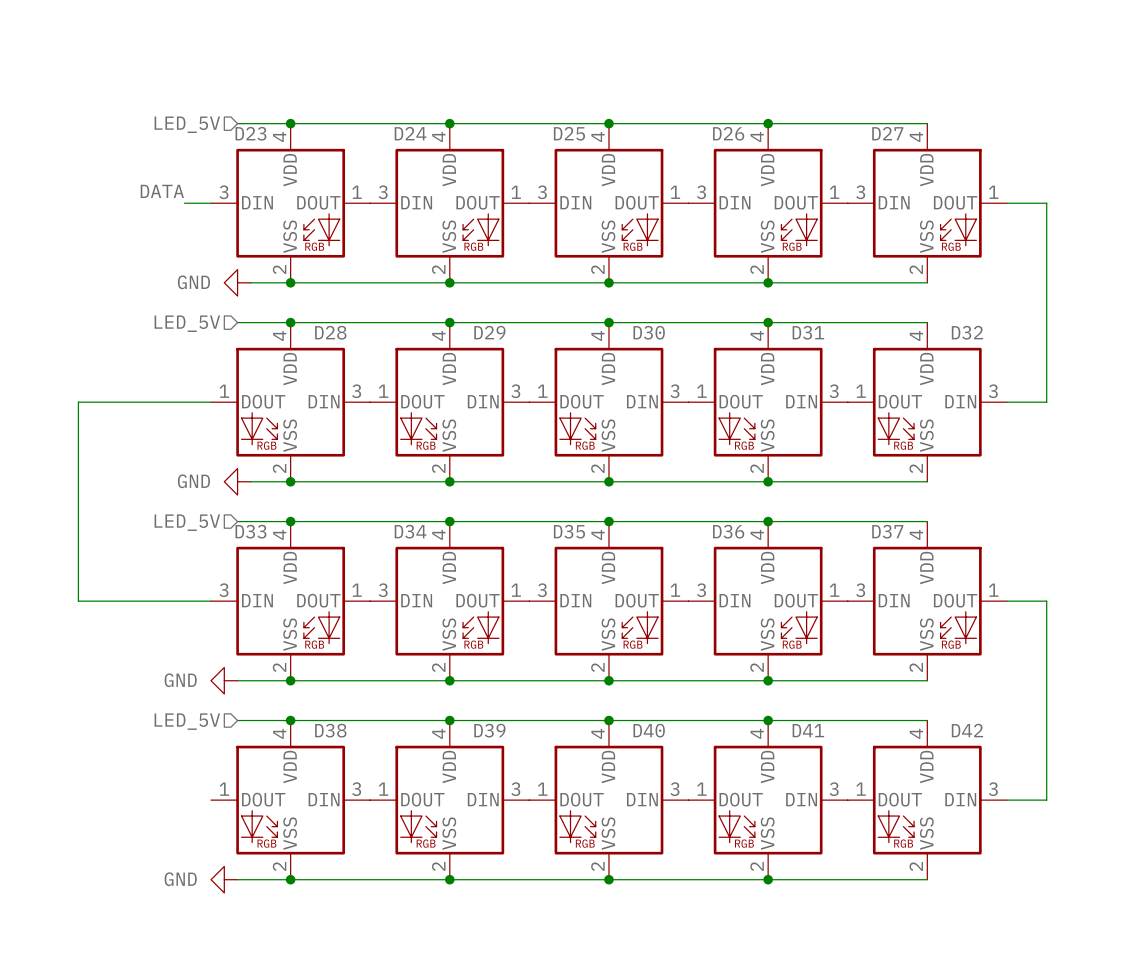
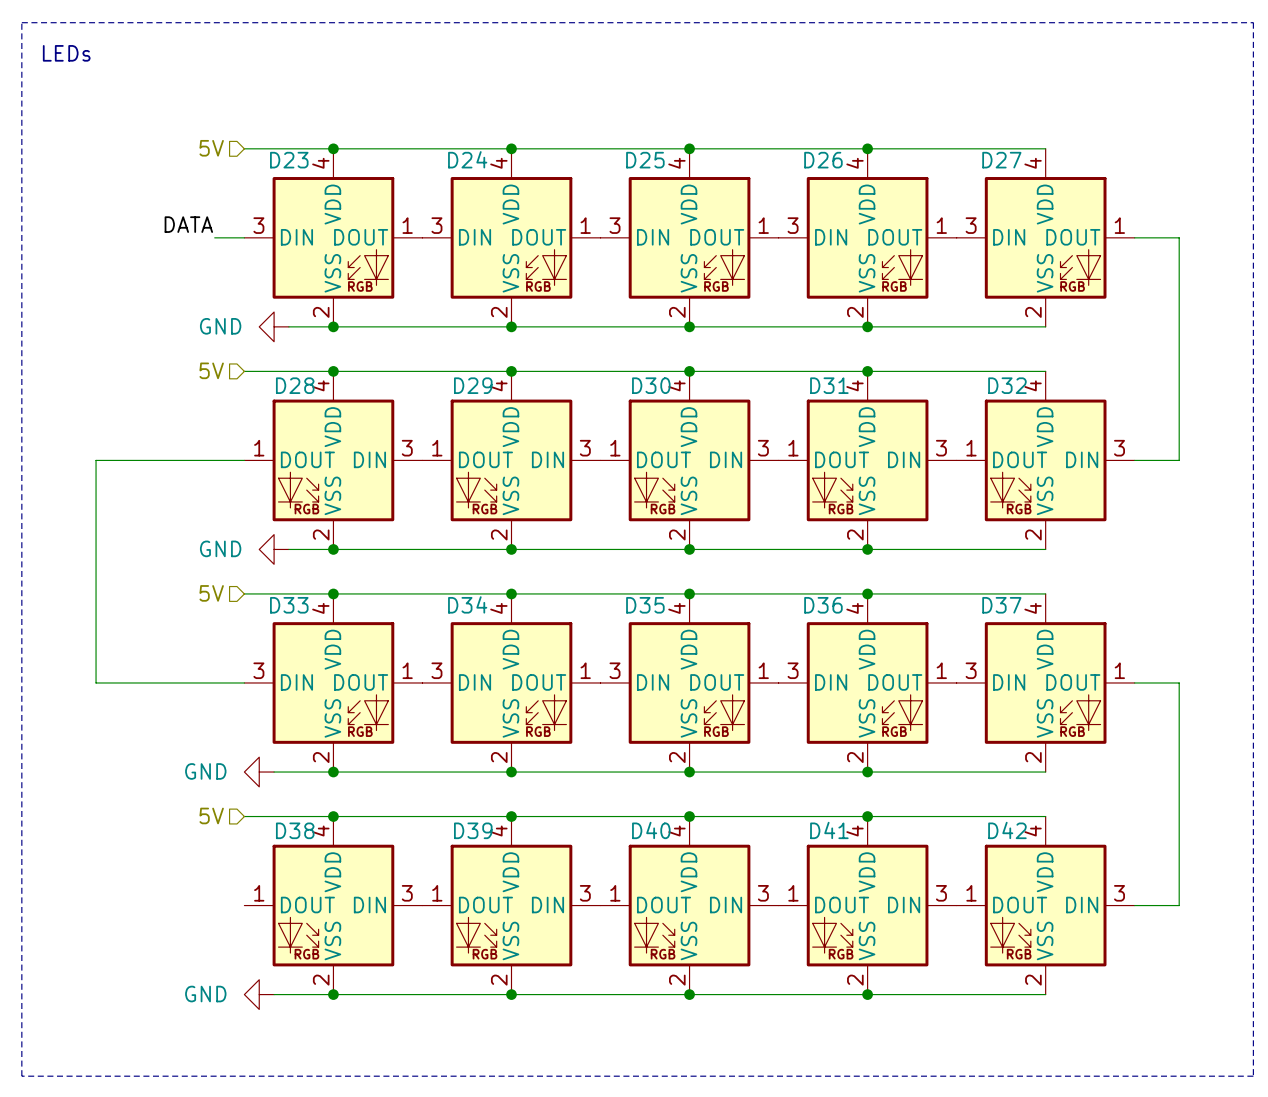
line: none -> (21, 22) (1253, 22) (1253, 1076) (21, 1076) (21, 22)
text: none -> LEDs (66, 53)
hierarchical label: none -> 5V (211, 148)
wire: none -> (244, 148) (274, 148)
hierarchical label: LED_5V (187, 124) -> none
hierarchical label: none -> 5V (211, 370)
wire: none -> (244, 371) (274, 371)
hierarchical label: LED_5V (187, 323) -> none
D28 name position: D28 (330, 332) -> D28 (295, 385)
D29 name position: D29 (489, 332) -> D29 (473, 385)
D30 name position: D30 (649, 332) -> D30 (651, 385)
D31 name position: D31 (808, 332) -> D31 (829, 385)
D32 name position: D32 (967, 332) -> D32 (1007, 385)
hierarchical label: none -> 5V (211, 593)
wire: none -> (244, 593) (274, 593)
hierarchical label: LED_5V (187, 522) -> none
hierarchical label: none -> 5V (211, 815)
wire: none -> (244, 816) (274, 816)
hierarchical label: LED_5V (187, 721) -> none
D38 name position: D38 (330, 730) -> D38 (295, 830)
D39 name position: D39 (489, 730) -> D39 (473, 830)
D40 name position: D40 (649, 730) -> D40 (651, 830)
D41 name position: D41 (808, 730) -> D41 (829, 830)
D42 name position: D42 (967, 730) -> D42 (1007, 830)

